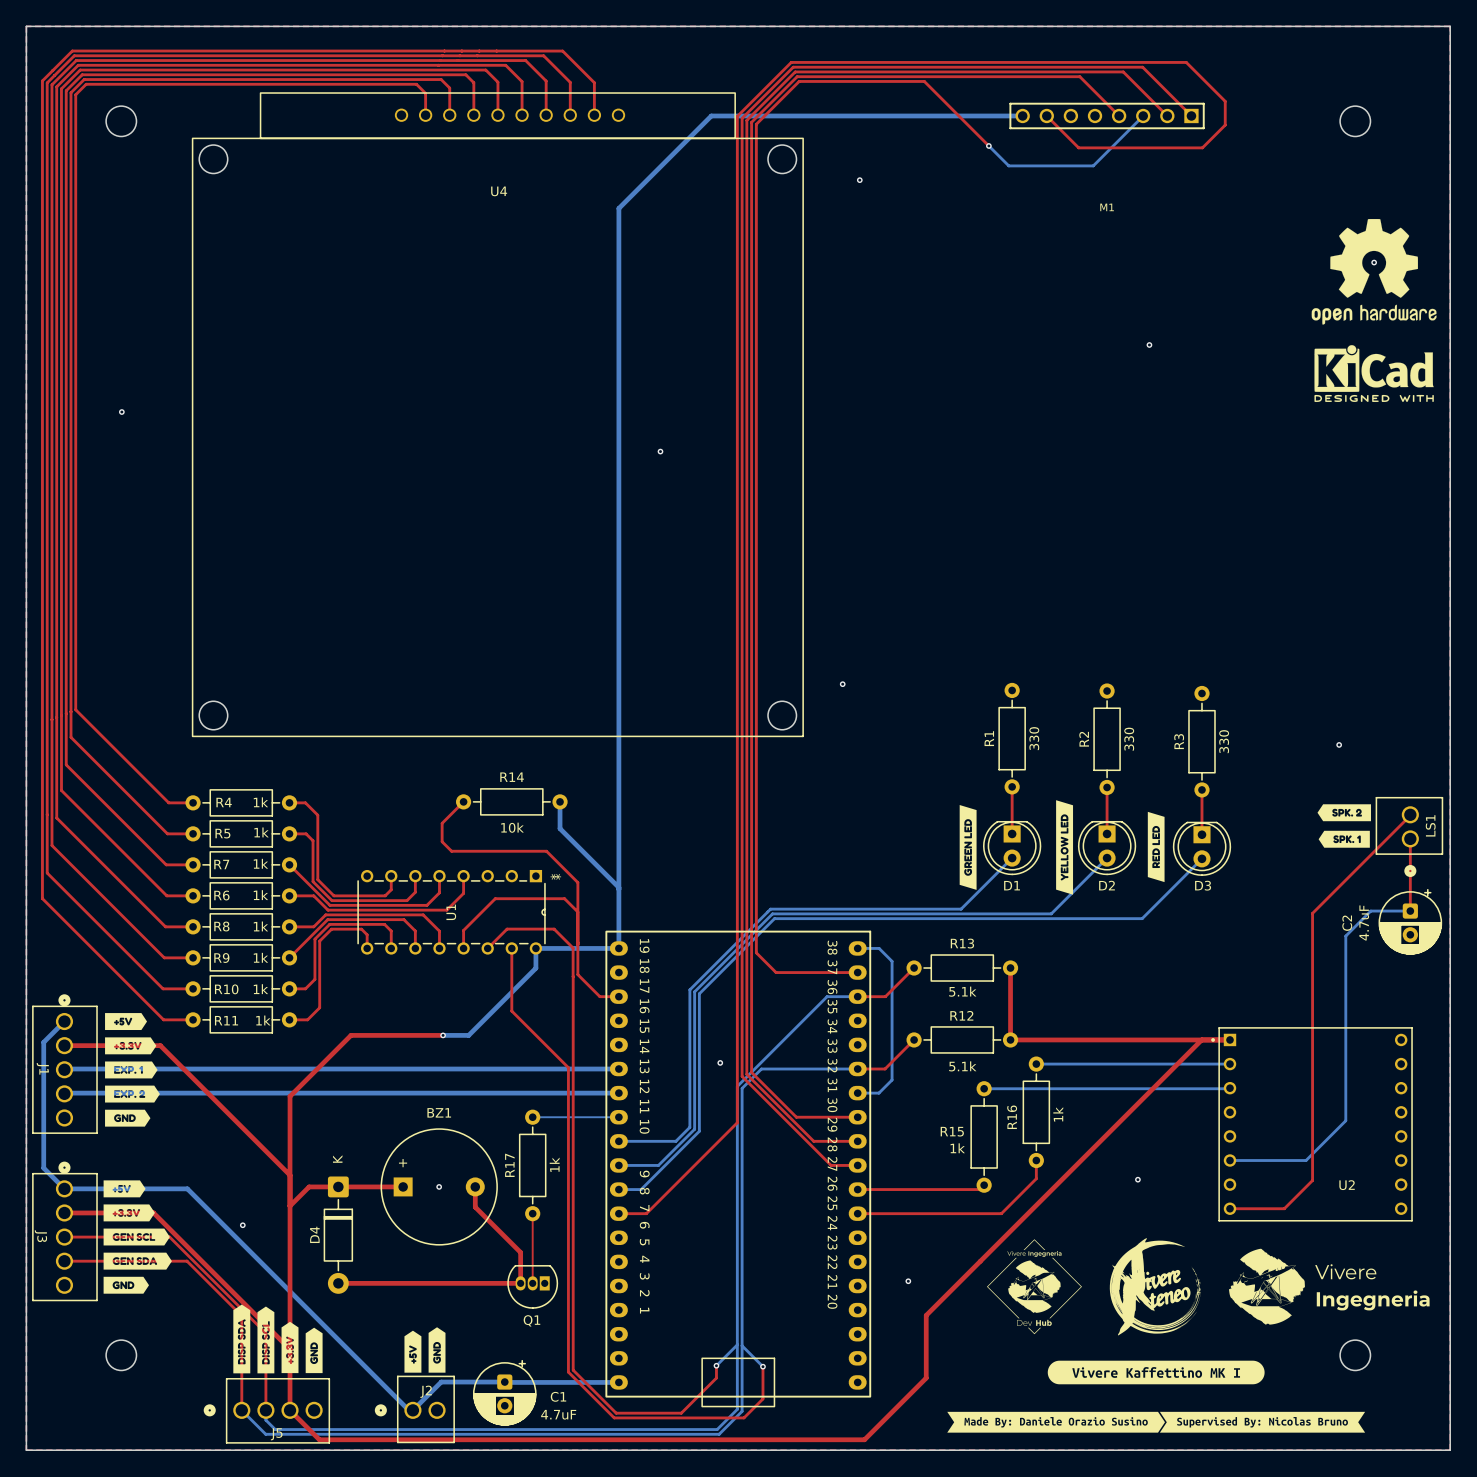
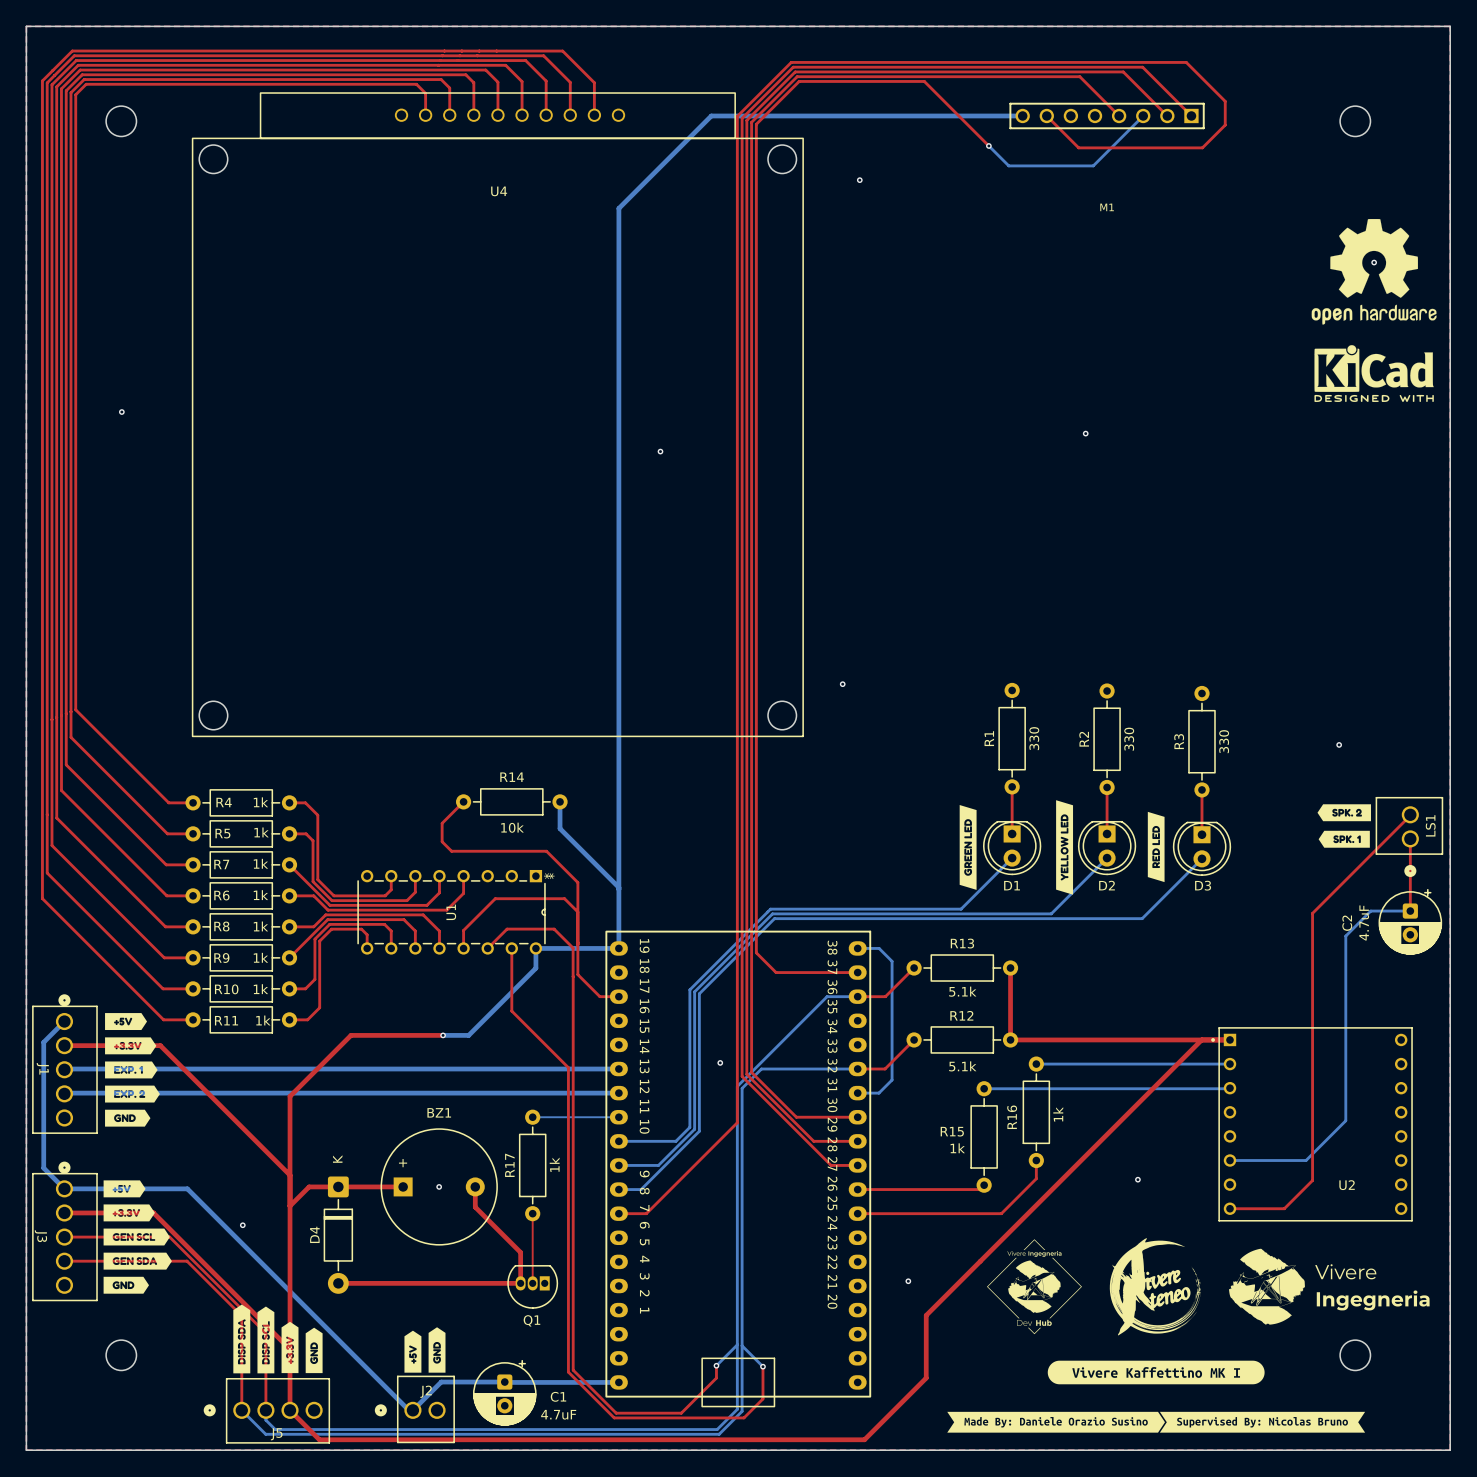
via: (1149, 345) -> none
via: none -> (1085, 433)
U1 footprint: [357, 869, 546, 955] -> [357, 869, 546, 955]

